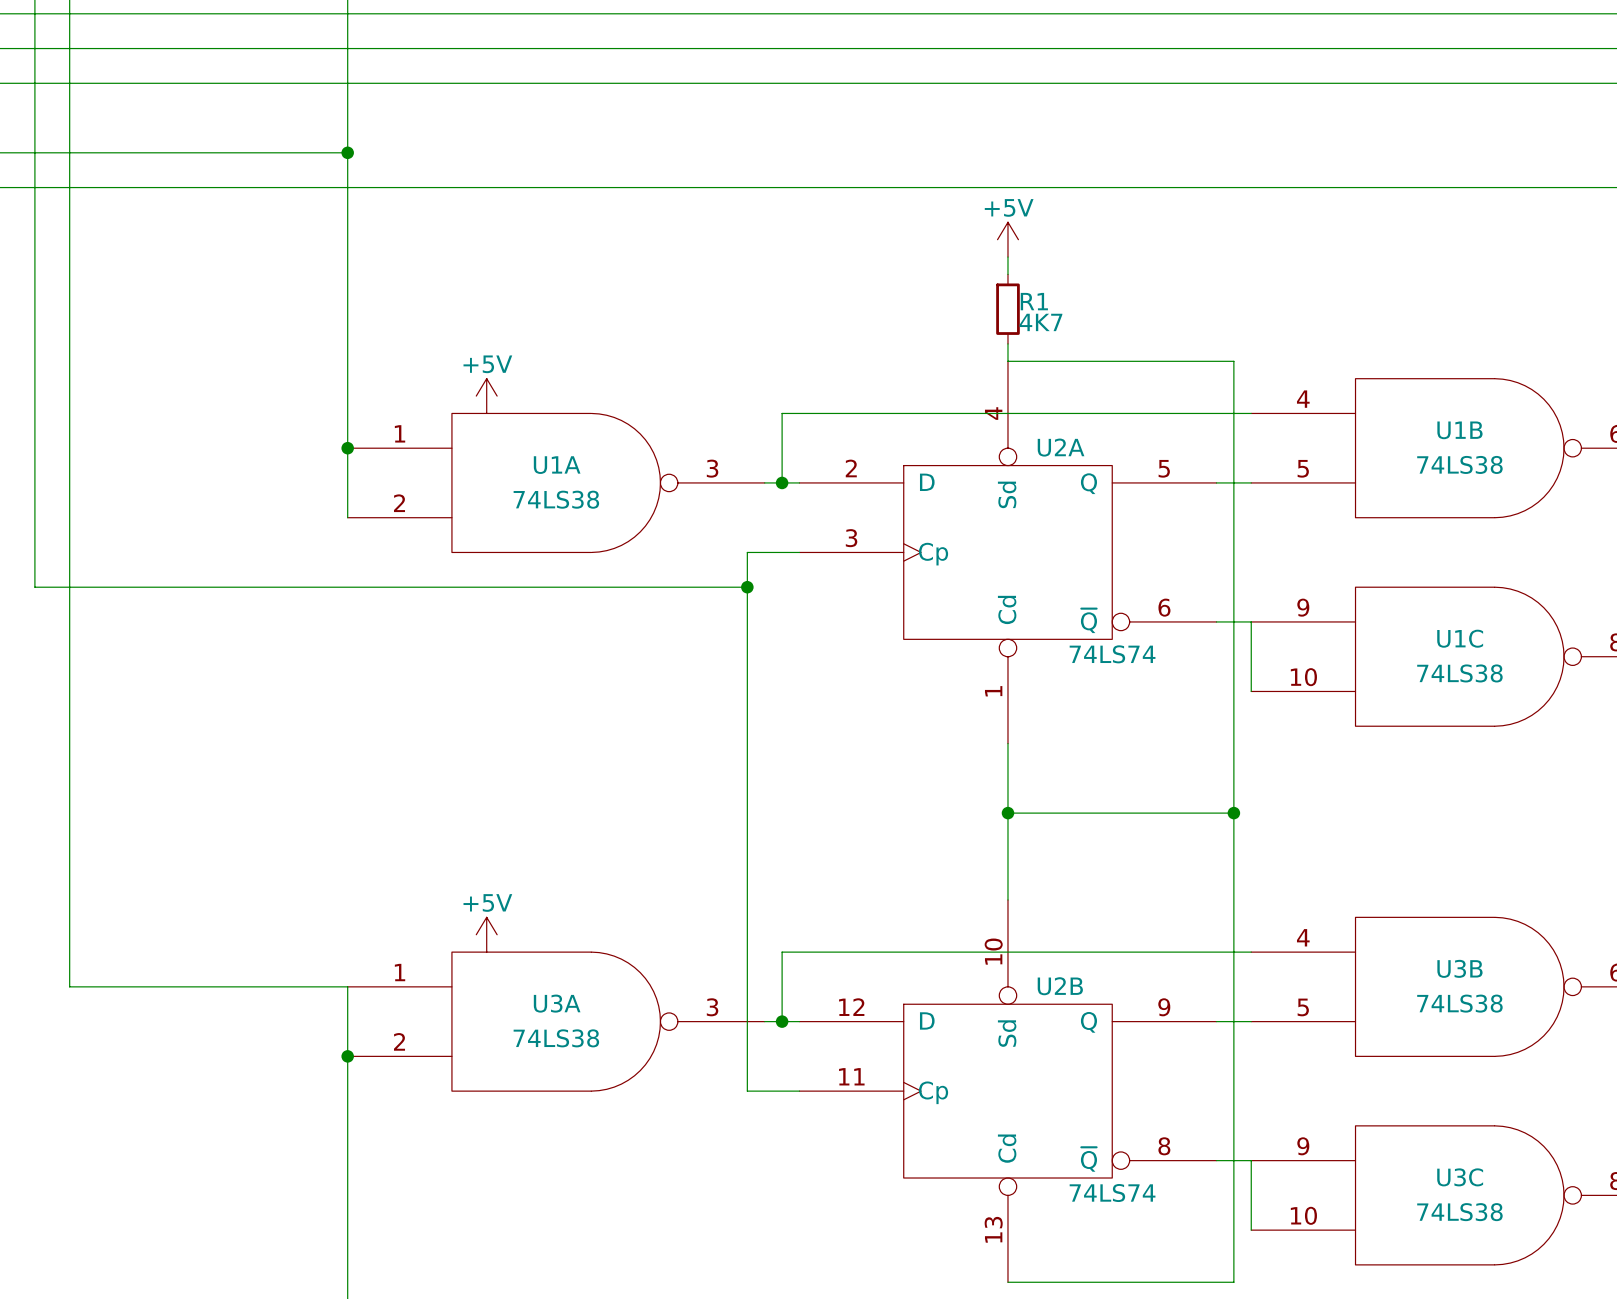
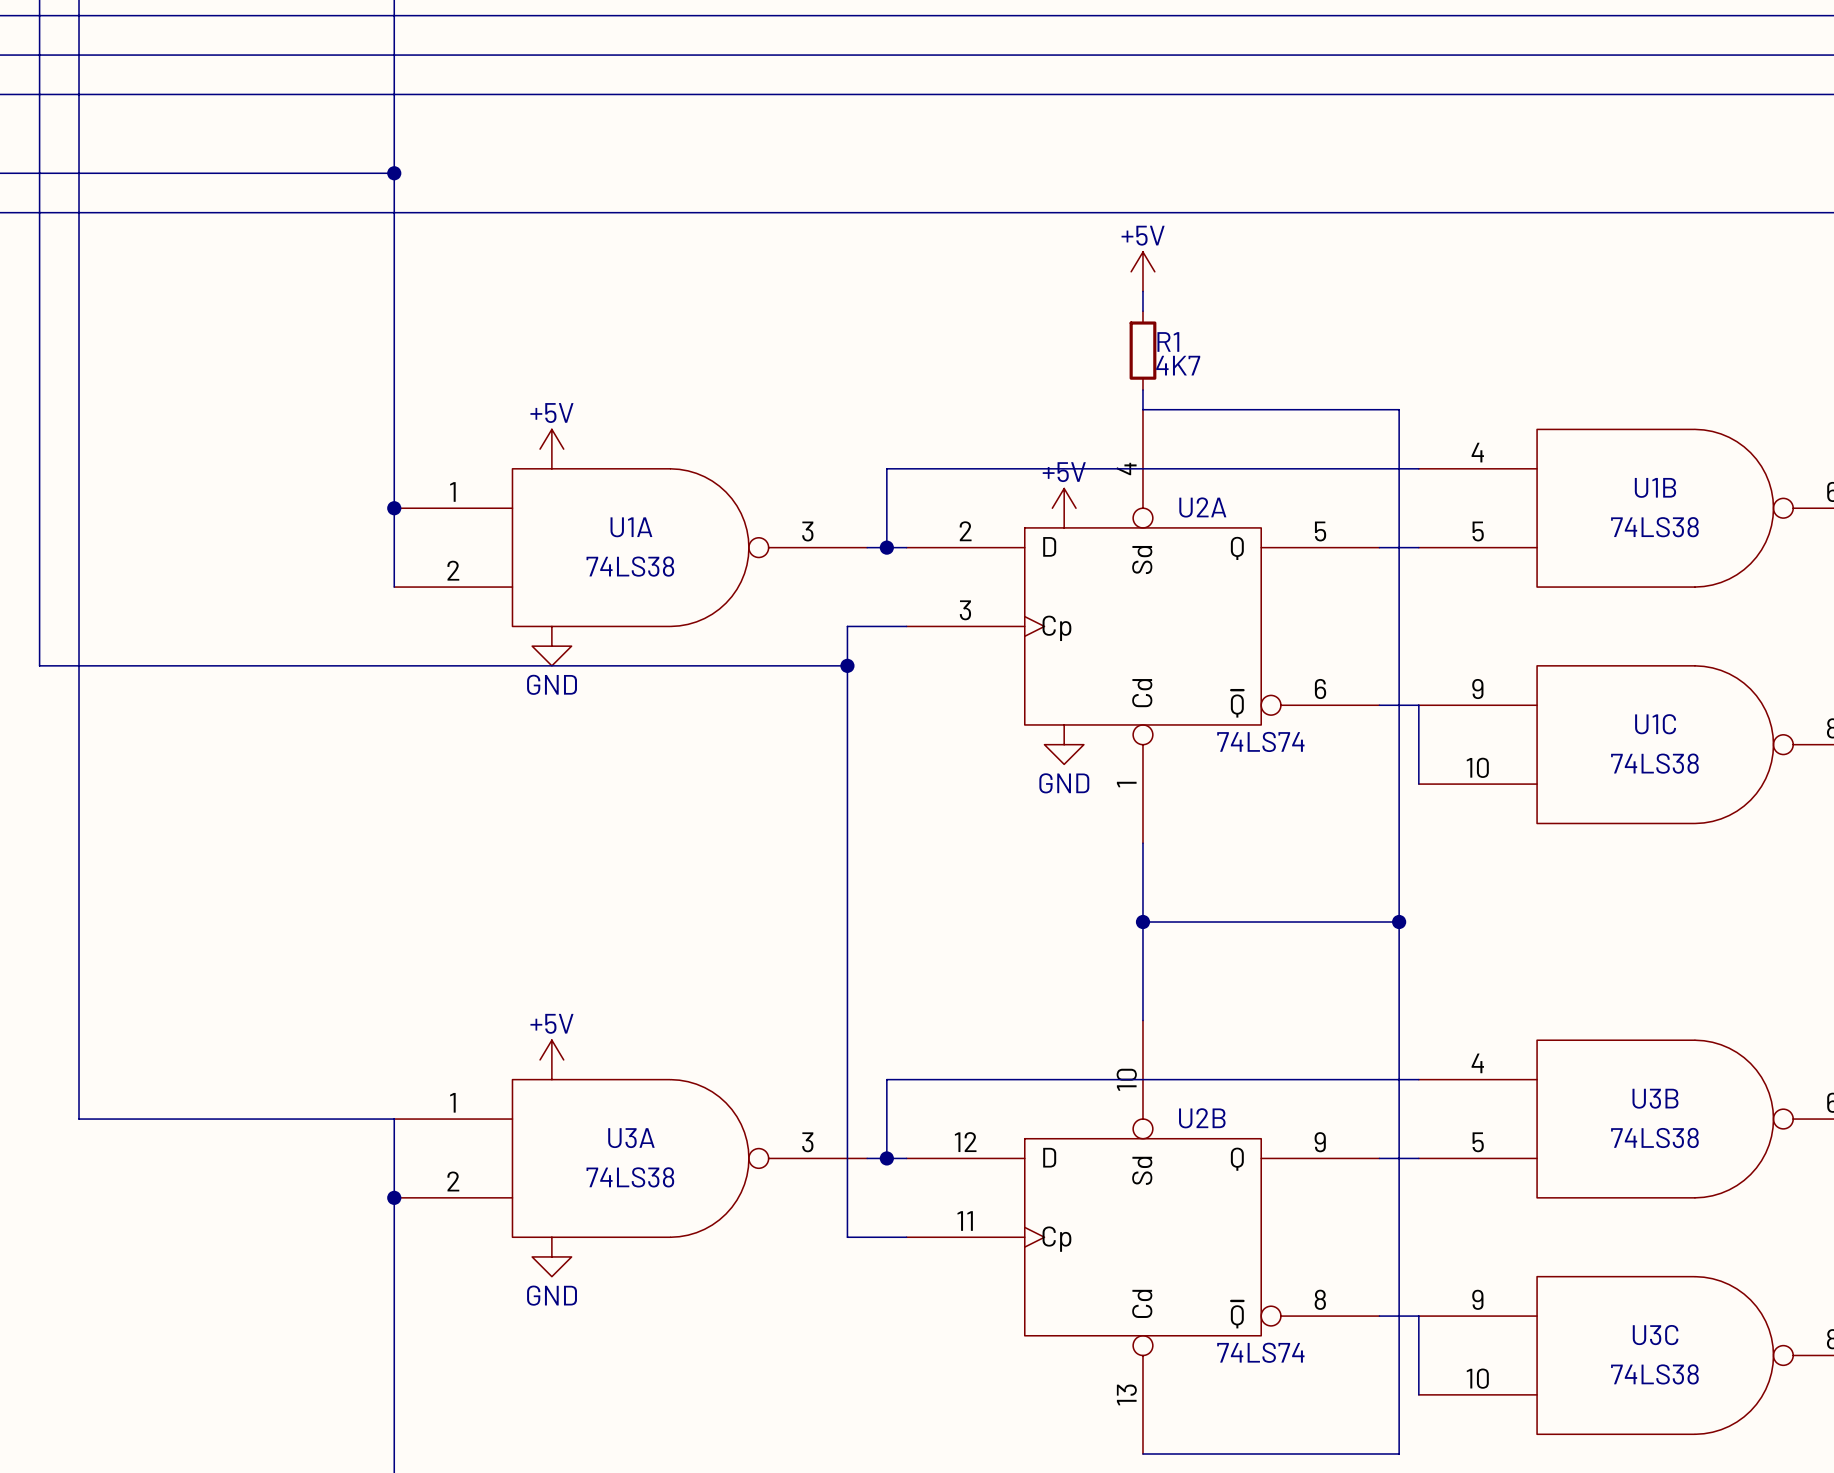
power symbol: none -> +5V (1064, 508)
power symbol: none -> GND (551, 646)
power symbol: none -> GND (1064, 744)
power symbol: none -> GND (551, 1256)

